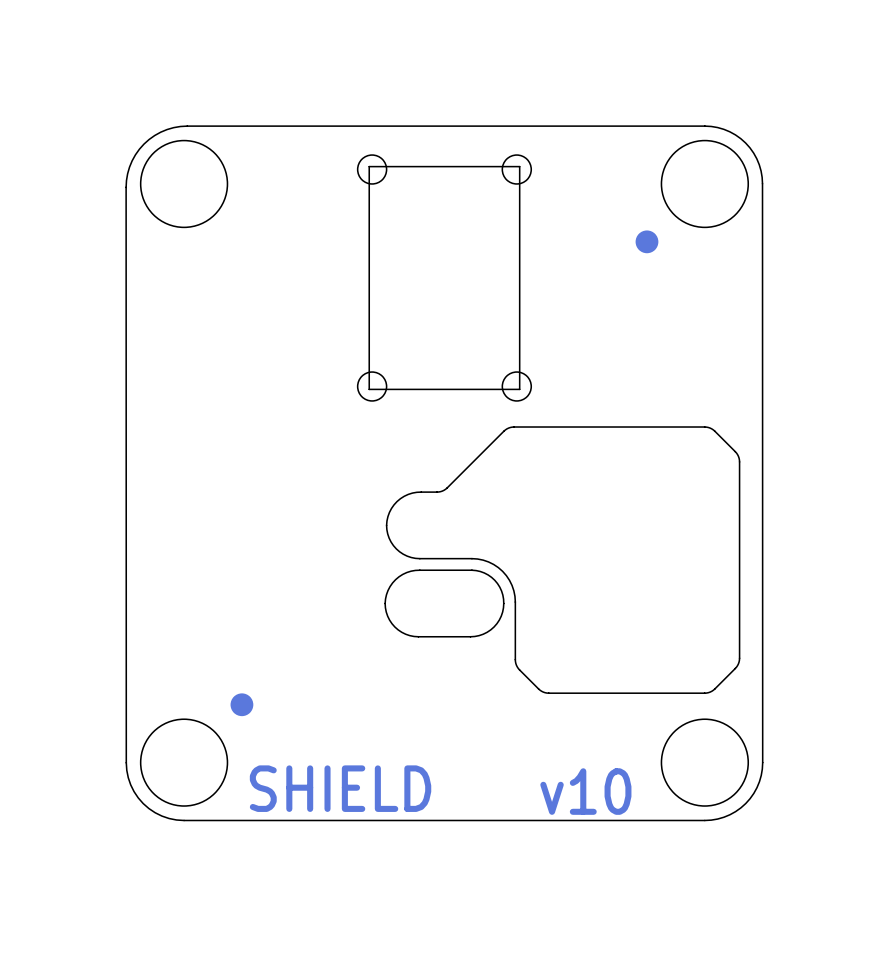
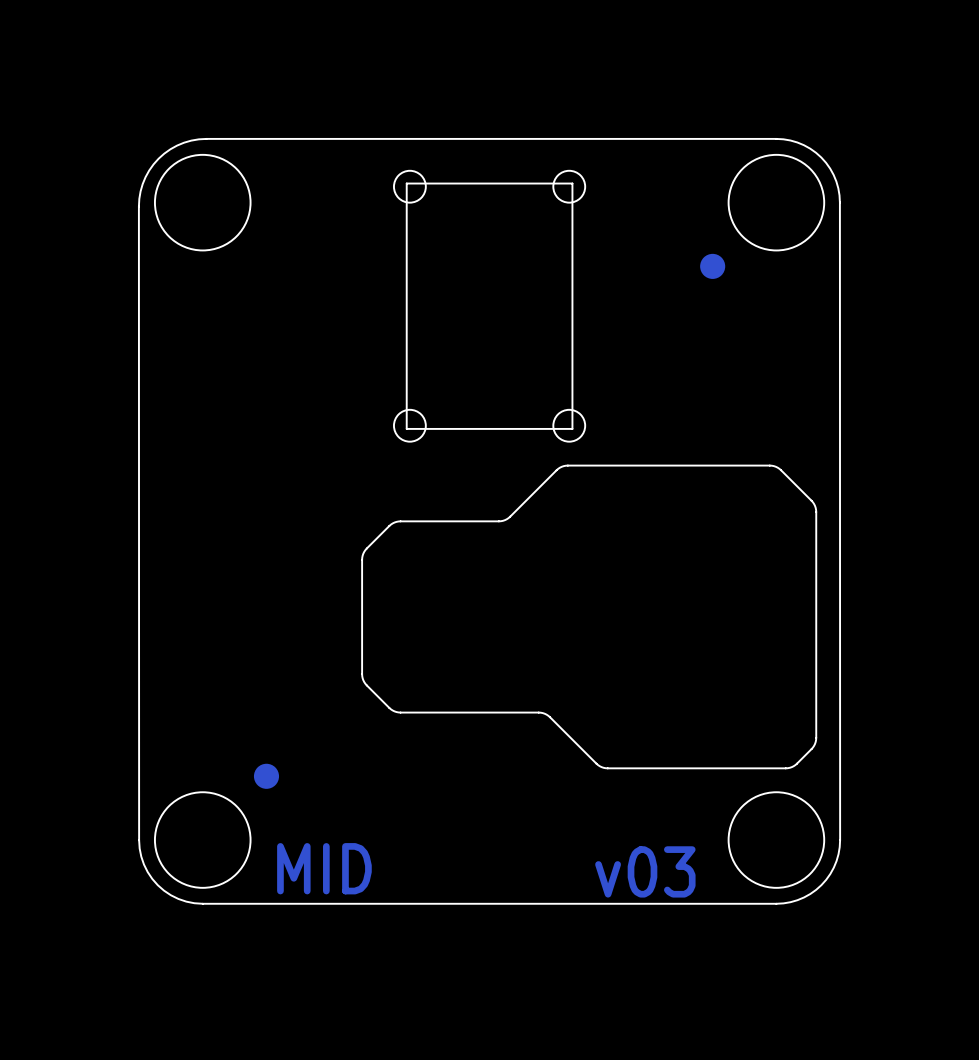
board edge: (704, 427) (508, 428) (444, 490) (412, 493) (397, 501) (389, 512) (386, 520) (389, 538) (399, 551) (411, 557) (477, 559) (493, 564) (502, 571) (509, 580) (514, 596) (515, 663) (519, 669) (543, 692) (710, 692) (735, 668) (739, 660) (739, 461) (736, 453) (714, 431) (704, 427) -> (769, 465) (781, 470) (811, 500) (816, 509) (816, 739) (812, 747) (793, 766) (785, 768) (605, 768) (596, 763) (544, 713) (398, 712) (389, 707) (364, 682) (362, 674) (362, 557) (366, 548) (392, 523) (400, 521) (503, 520) (510, 516) (556, 470) (565, 465) (769, 465)
board edge: (471, 570) (415, 570) (402, 574) (392, 582) (386, 594) (385, 607) (389, 620) (398, 629) (414, 636) (470, 636) (487, 632) (496, 623) (501, 616) (503, 607) (502, 595) (499, 587) (491, 577) (480, 571) (471, 570) -> none
text: SHIELD (340, 788) -> MID (324, 868)
text: v10 (585, 791) -> v03 (645, 871)

